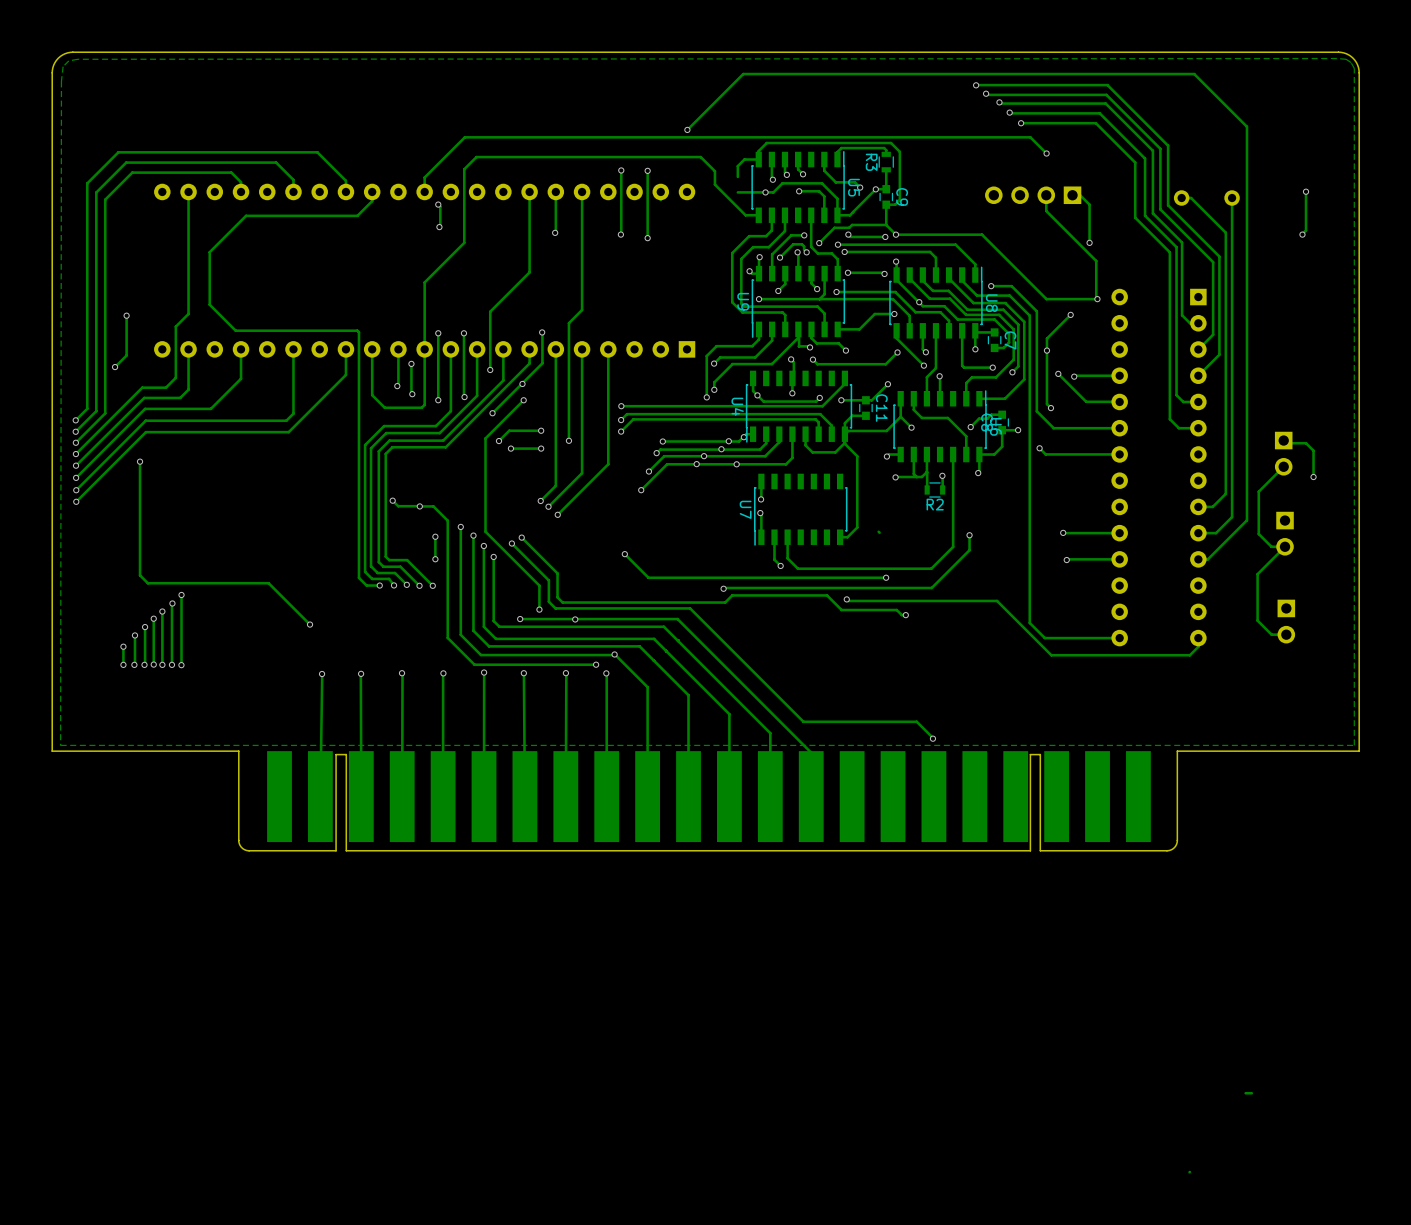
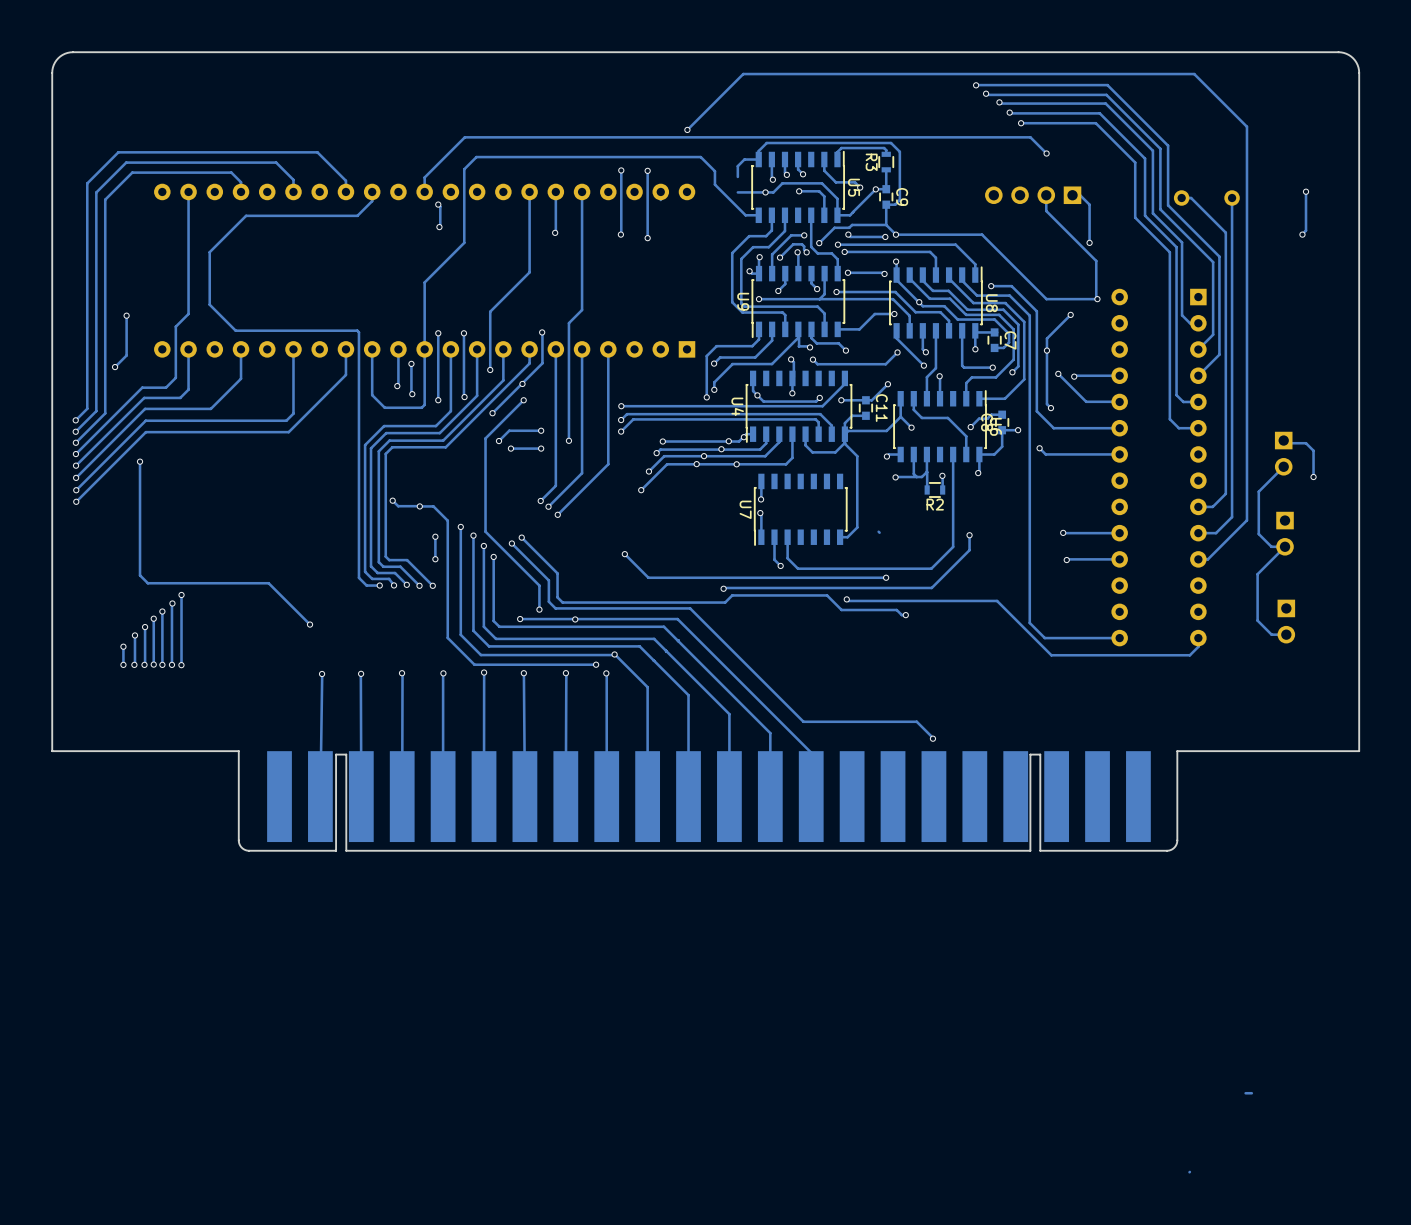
zone outline: (1336, 58) (1346, 59) (1354, 68) (1354, 745) (60, 745) (61, 81) (63, 66) (68, 60) (77, 59) (1336, 58) -> none

